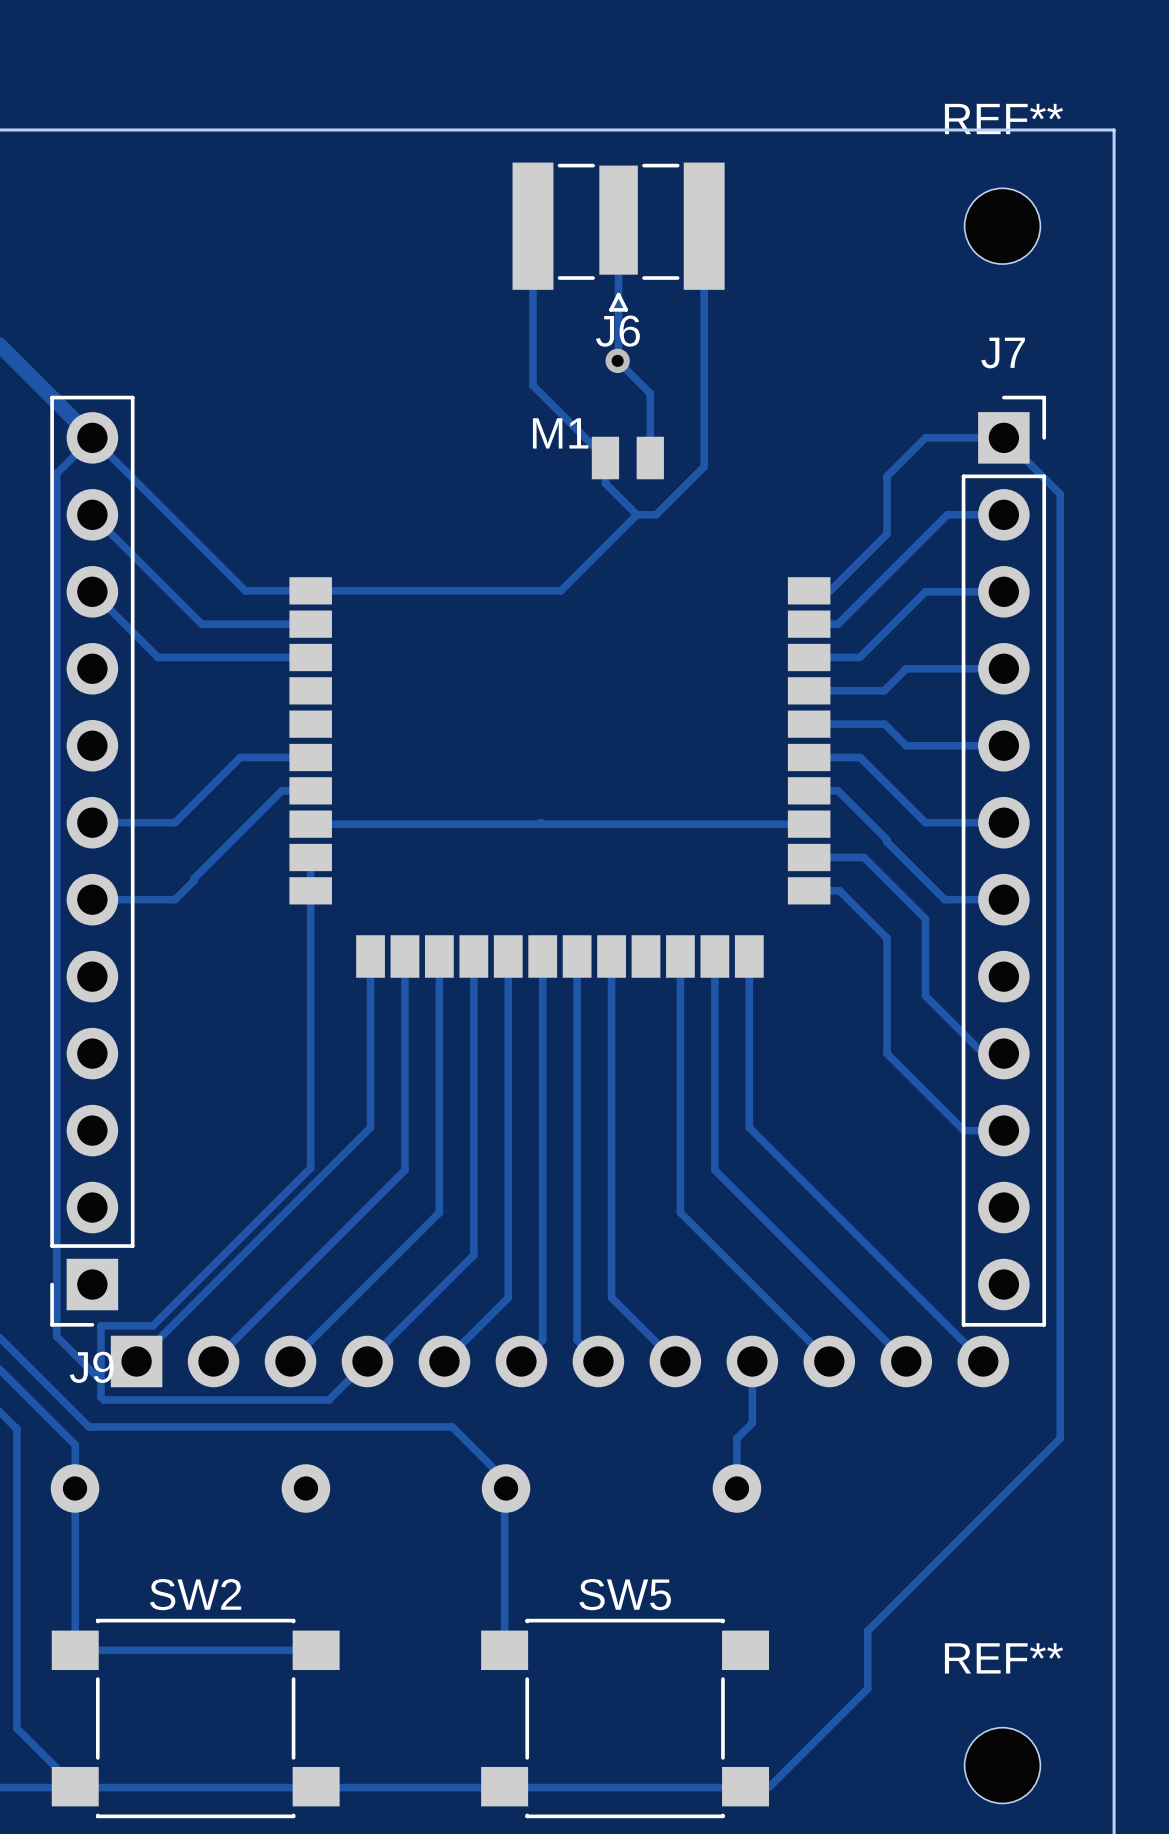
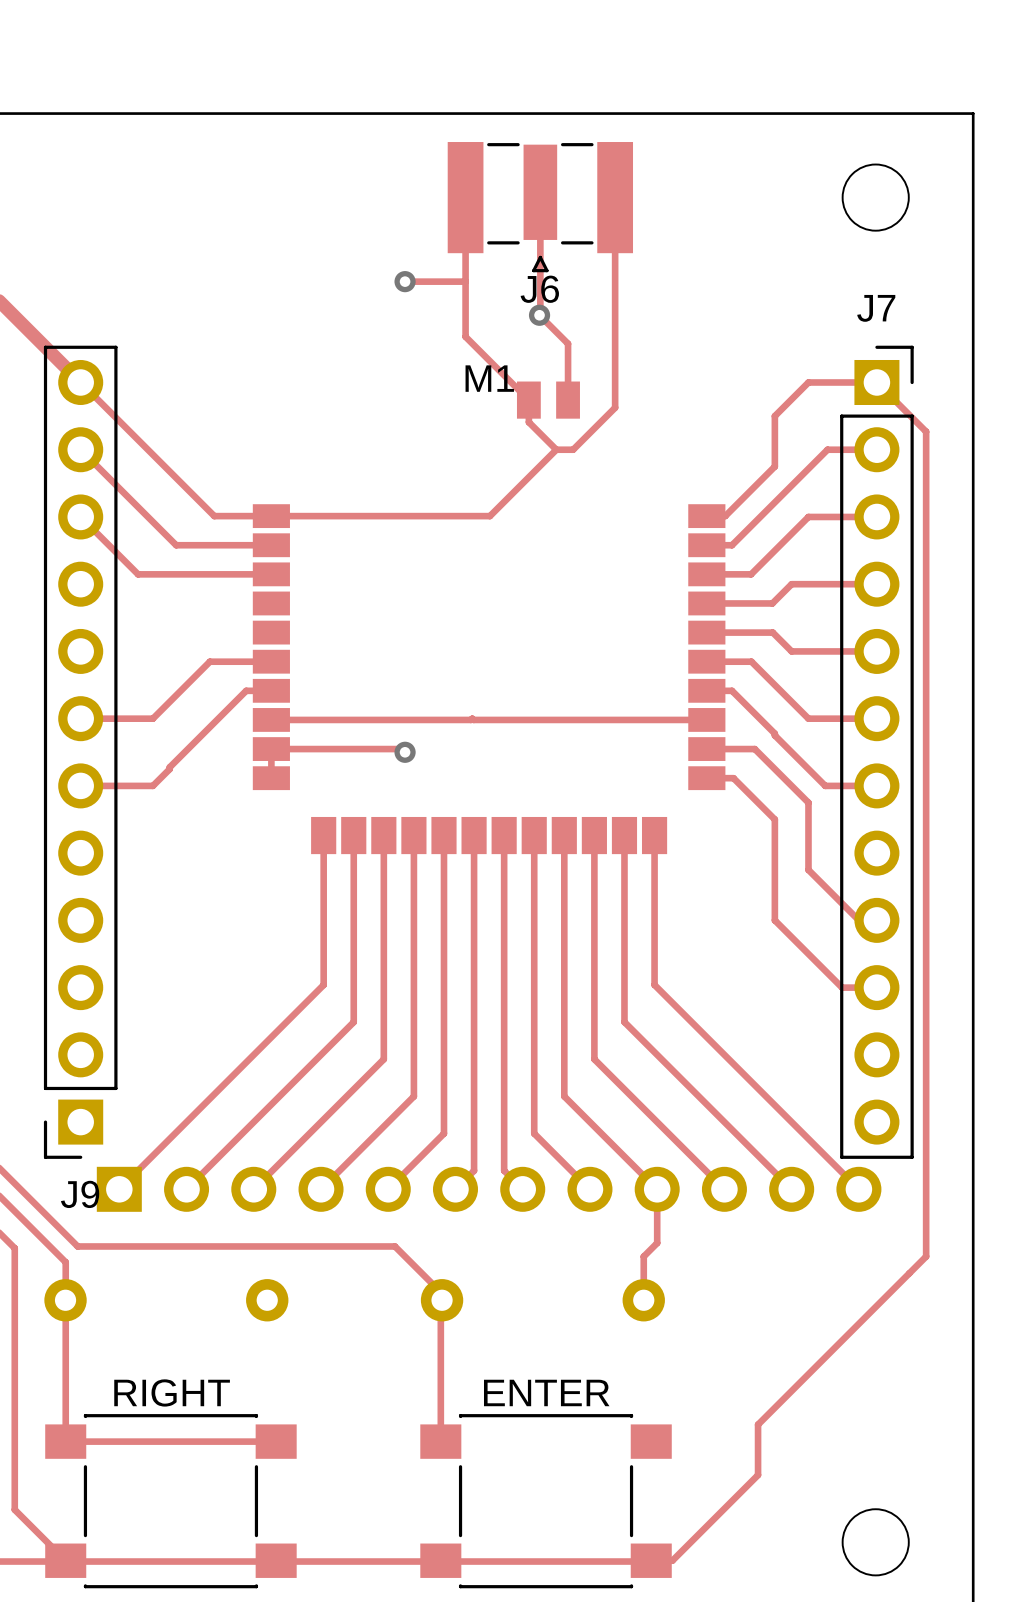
REF** name: REF** (1003, 119) -> none
track: none -> (405, 281) (465, 281)
via: none -> (405, 281)
track: (92, 437) (56, 473) (56, 1336) (100, 1380) -> none
track: none -> (271, 749) (401, 749) (405, 752)
via: none -> (405, 752)
track: (310, 890) (310, 1168) (152, 1325) (100, 1325) (100, 1397) (103, 1399) (329, 1399) (357, 1371) -> none
track: none -> (564, 835) (564, 1096) (648, 1180)
SW2 name: SW2 (195, 1594) -> RIGHT (172, 1392)
SW5 name: SW5 (625, 1594) -> ENTER (546, 1392)
REF** name: REF** (1003, 1658) -> none

